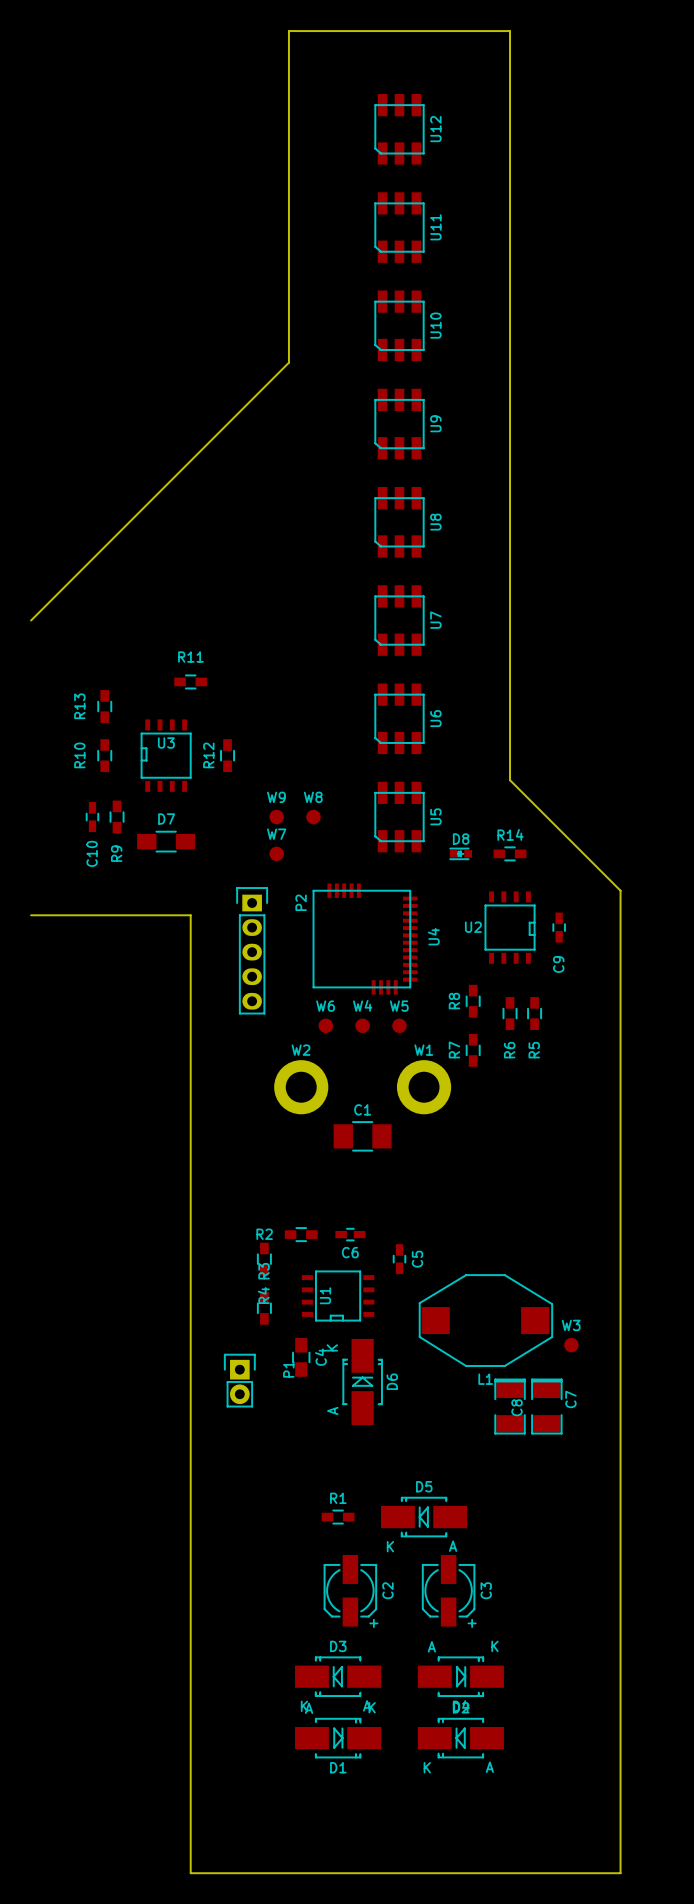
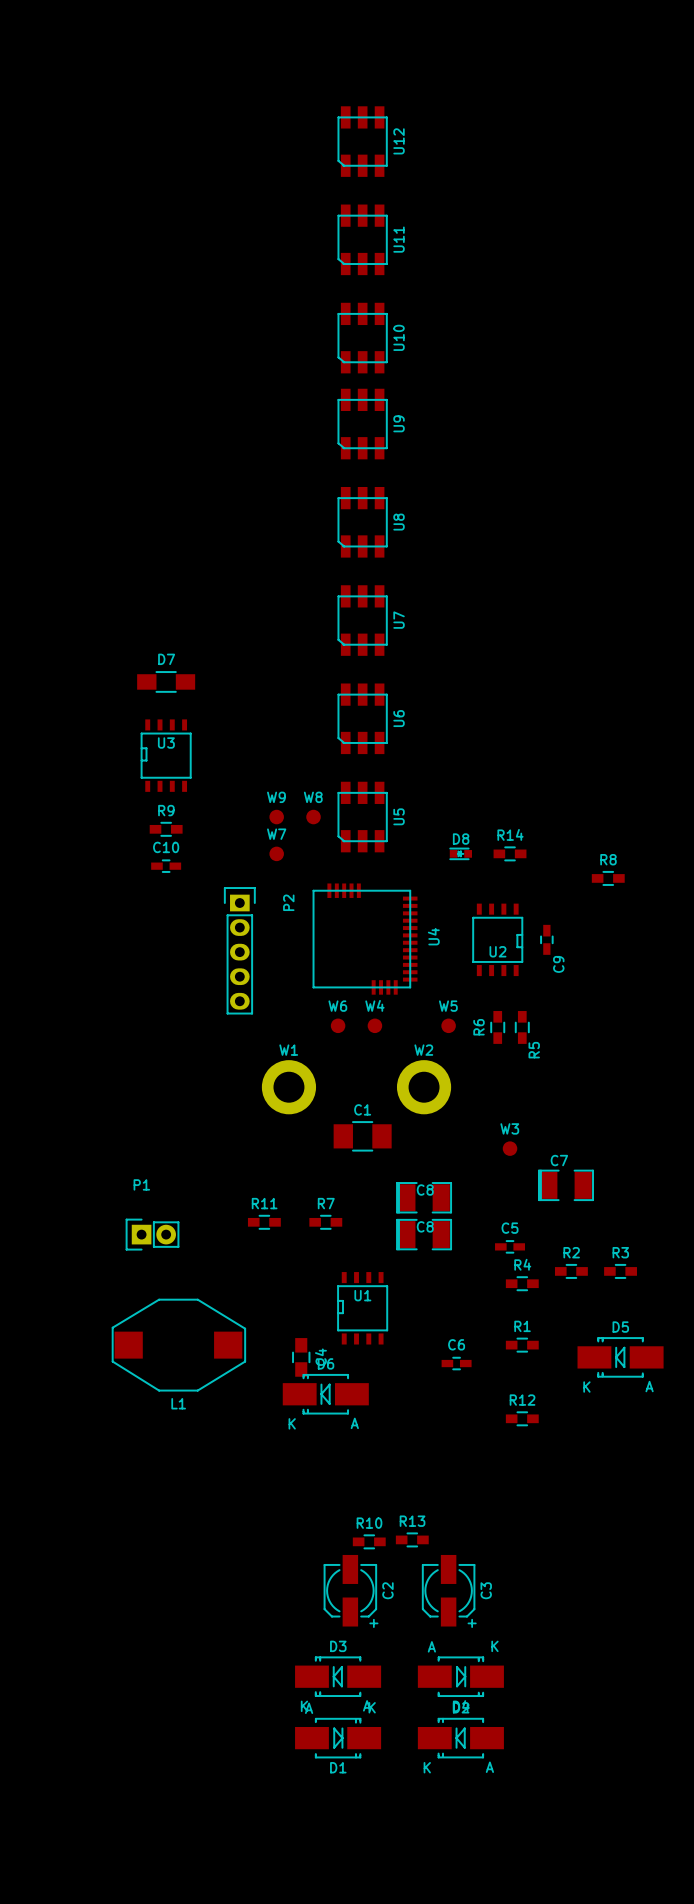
U12 position: (399, 129) -> (362, 141)
U11 position: (399, 227) -> (362, 239)
U10 position: (399, 325) -> (362, 338)
U9 position: (399, 424) -> (362, 424)
U8 position: (399, 522) -> (362, 522)
board edge: (31, 620) (288, 362) (288, 31) (510, 31) (510, 780) (620, 890) (620, 1873) (190, 1873) (190, 915) (31, 915) -> none
U7 position: (399, 620) -> (362, 620)
R11 name position: R11 (190, 657) -> R11 (264, 1203)
R11 position: (190, 681) -> (264, 1222)
R13 rotation: 0° (104, 706) -> 90° clockwise (412, 1539)
R13 position: (104, 706) -> (412, 1539)
U6 position: (399, 718) -> (362, 718)
R10 rotation: 0° (104, 755) -> 90° clockwise (369, 1541)
R10 position: (104, 755) -> (369, 1541)
R12 rotation: 0° (227, 755) -> 90° clockwise (522, 1418)
R12 position: (227, 755) -> (522, 1418)
C10 rotation: 0° (92, 817) -> 90° clockwise (166, 866)
C10 position: (92, 817) -> (166, 866)
R9 rotation: 0° (117, 817) -> 90° clockwise (166, 829)
R9 position: (117, 817) -> (166, 829)
U5 position: (399, 817) -> (362, 817)
D7 position: (166, 841) -> (166, 681)
C10 name position: C10 (92, 853) -> C10 (166, 847)
R9 name position: R9 (116, 853) -> R9 (166, 810)
U2 name position: U2 (473, 927) -> U2 (497, 951)
U2 position: (510, 927) -> (497, 939)
C9 position: (559, 927) -> (546, 939)
P2 position: (252, 950) -> (239, 950)
R8 rotation: 0° (473, 1001) -> 90° clockwise (608, 878)
R8 position: (473, 1001) -> (608, 878)
R6 position: (510, 1013) -> (497, 1027)
R5 position: (534, 1013) -> (522, 1027)
W6 position: (325, 1025) -> (338, 1025)
W4 position: (362, 1025) -> (374, 1025)
W5 position: (399, 1025) -> (448, 1025)
W1 name: W1 (423, 1050) -> W2 (423, 1050)
R7 rotation: 0° (473, 1050) -> 90° clockwise (325, 1222)
R7 position: (473, 1050) -> (325, 1222)
R6 name position: R6 (509, 1050) -> R6 (479, 1027)
W1: none -> (288, 1087)
W2: (301, 1087) -> none
C8: none -> (424, 1197)
R2 name position: R2 (264, 1234) -> R2 (571, 1252)
R2 position: (301, 1234) -> (571, 1271)
C6 position: (350, 1234) -> (456, 1363)
C8: none -> (424, 1234)
C6 name position: C6 (350, 1252) -> C6 (456, 1344)
R4 rotation: 0° (264, 1259) -> 90° clockwise (522, 1283)
R4 position: (264, 1259) -> (522, 1283)
C5 rotation: 0° (399, 1259) -> 90° clockwise (510, 1246)
C5 position: (399, 1259) -> (510, 1246)
C5 name position: C5 (417, 1259) -> C5 (510, 1228)
R4 name position: R4 (263, 1295) -> R4 (522, 1264)
U1 rotation: 0° (338, 1296) -> 90° clockwise (362, 1308)
R3 rotation: 0° (264, 1308) -> 90° clockwise (620, 1271)
R3 position: (264, 1308) -> (620, 1271)
L1 position: (485, 1320) -> (178, 1345)
W3 position: (571, 1345) -> (510, 1148)
P1 rotation: 0° (239, 1380) -> 90° counterclockwise (152, 1234)
P1 position: (239, 1380) -> (152, 1234)
D6 rotation: 0° (362, 1381) -> 90° counterclockwise (325, 1394)
C8: (510, 1406) -> none
C7 rotation: 0° (546, 1406) -> 90° counterclockwise (565, 1185)
C7 position: (546, 1406) -> (565, 1185)
R1 position: (338, 1517) -> (522, 1345)
D5 position: (424, 1517) -> (620, 1357)

